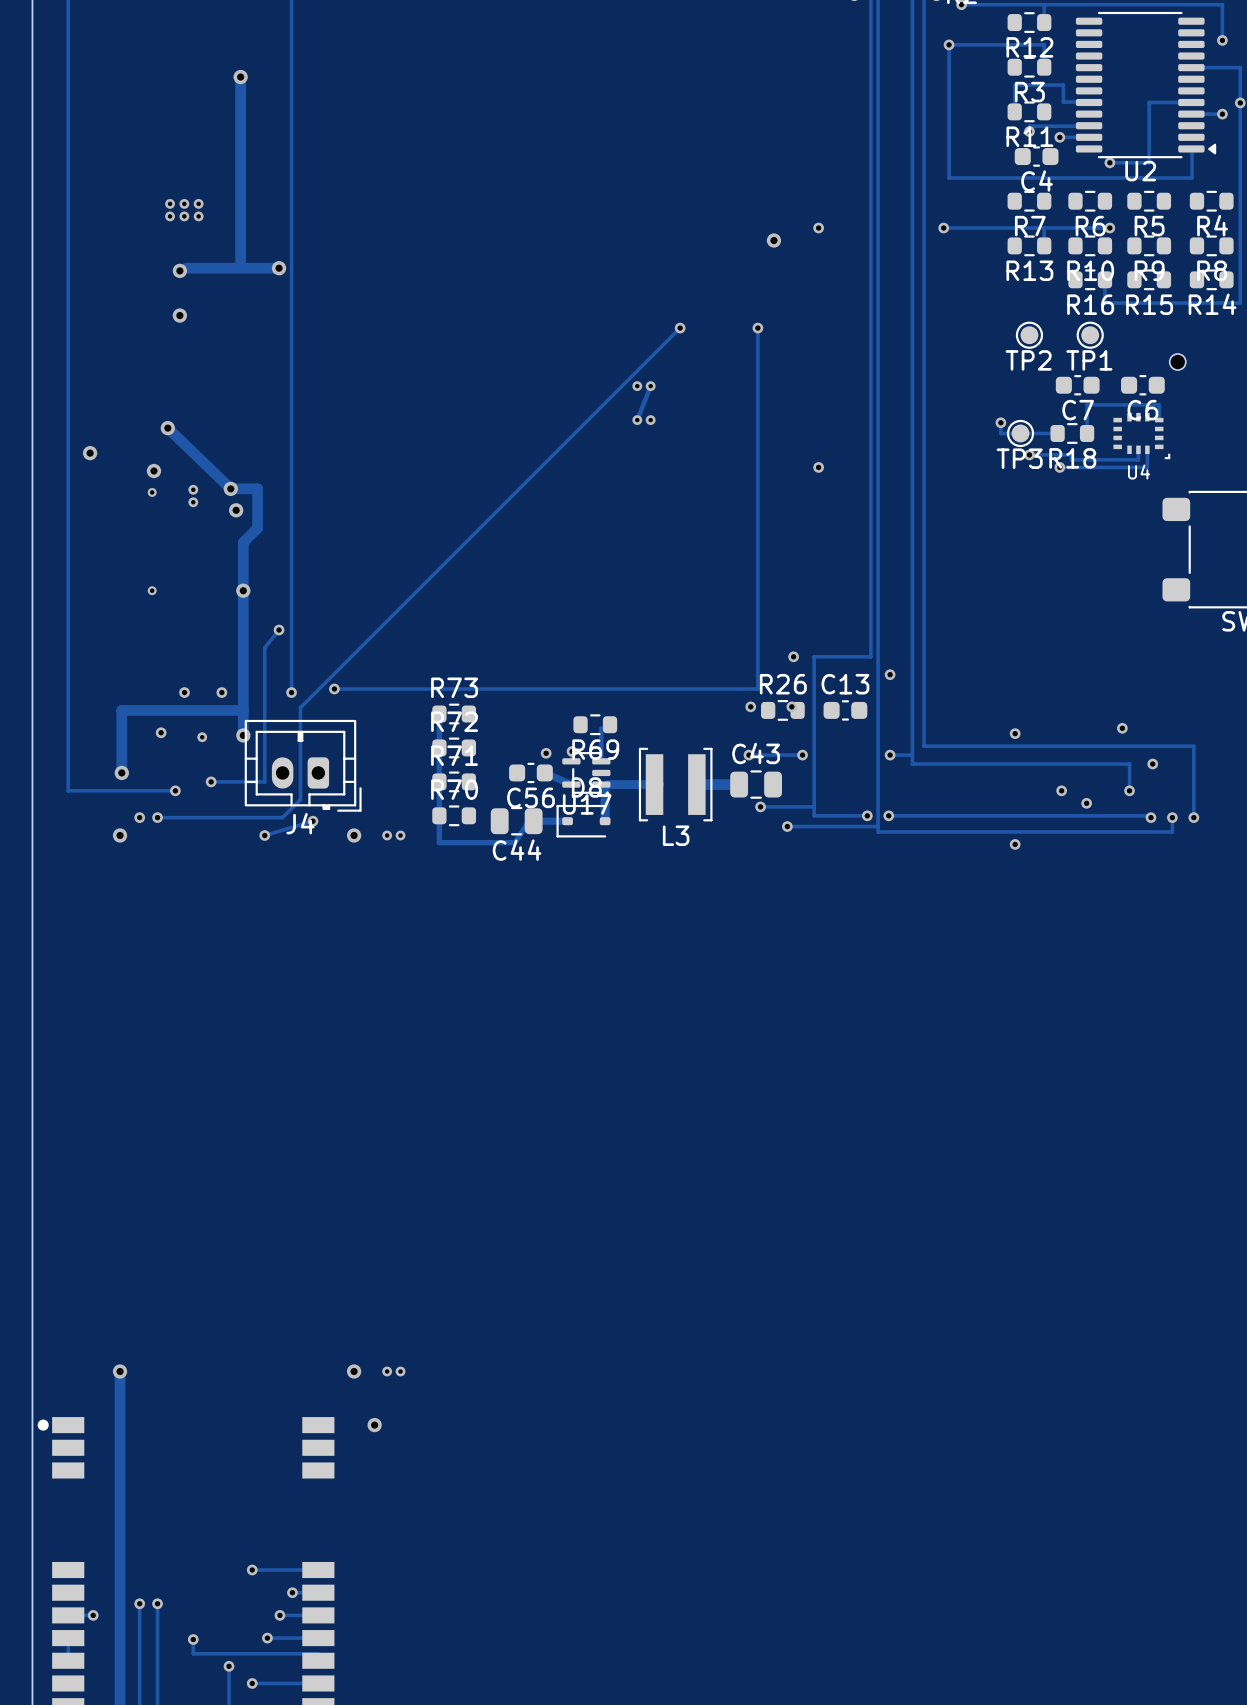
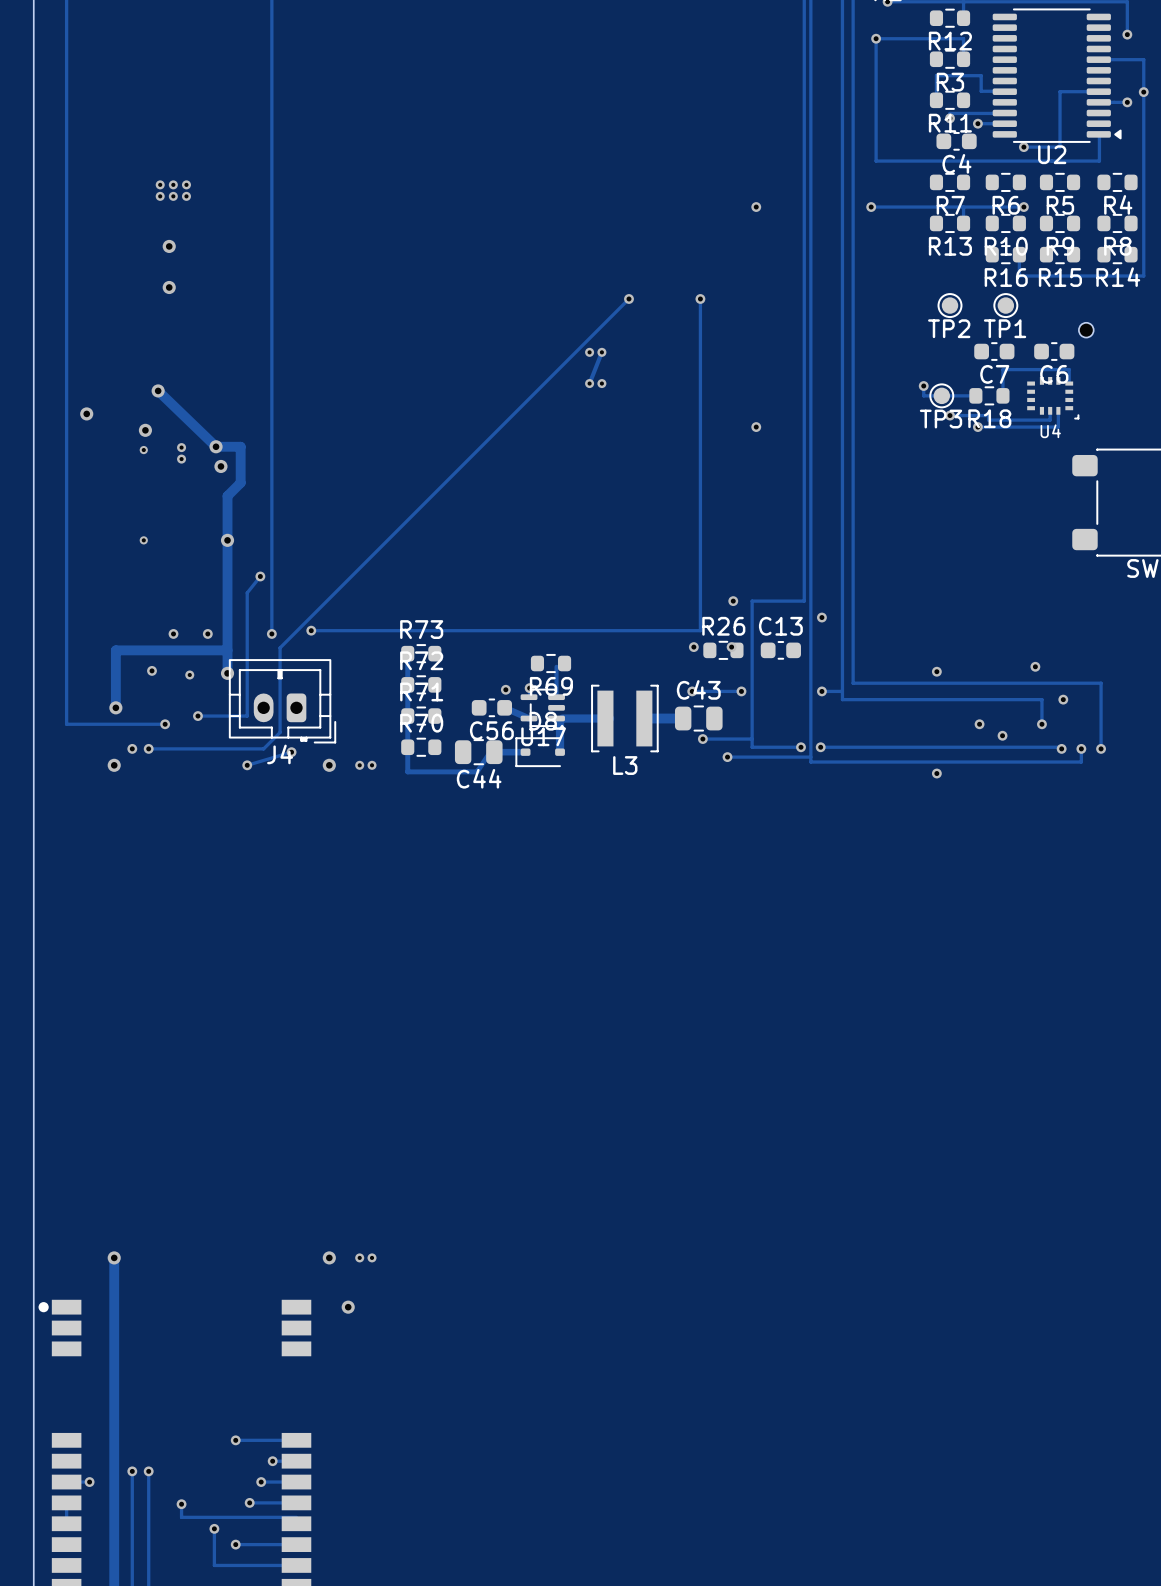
track: (240, 77) (240, 262) -> none
via: (240, 77) -> none
via: (773, 240) -> none
track: (279, 268) (186, 268) -> none
via: (279, 268) -> none

